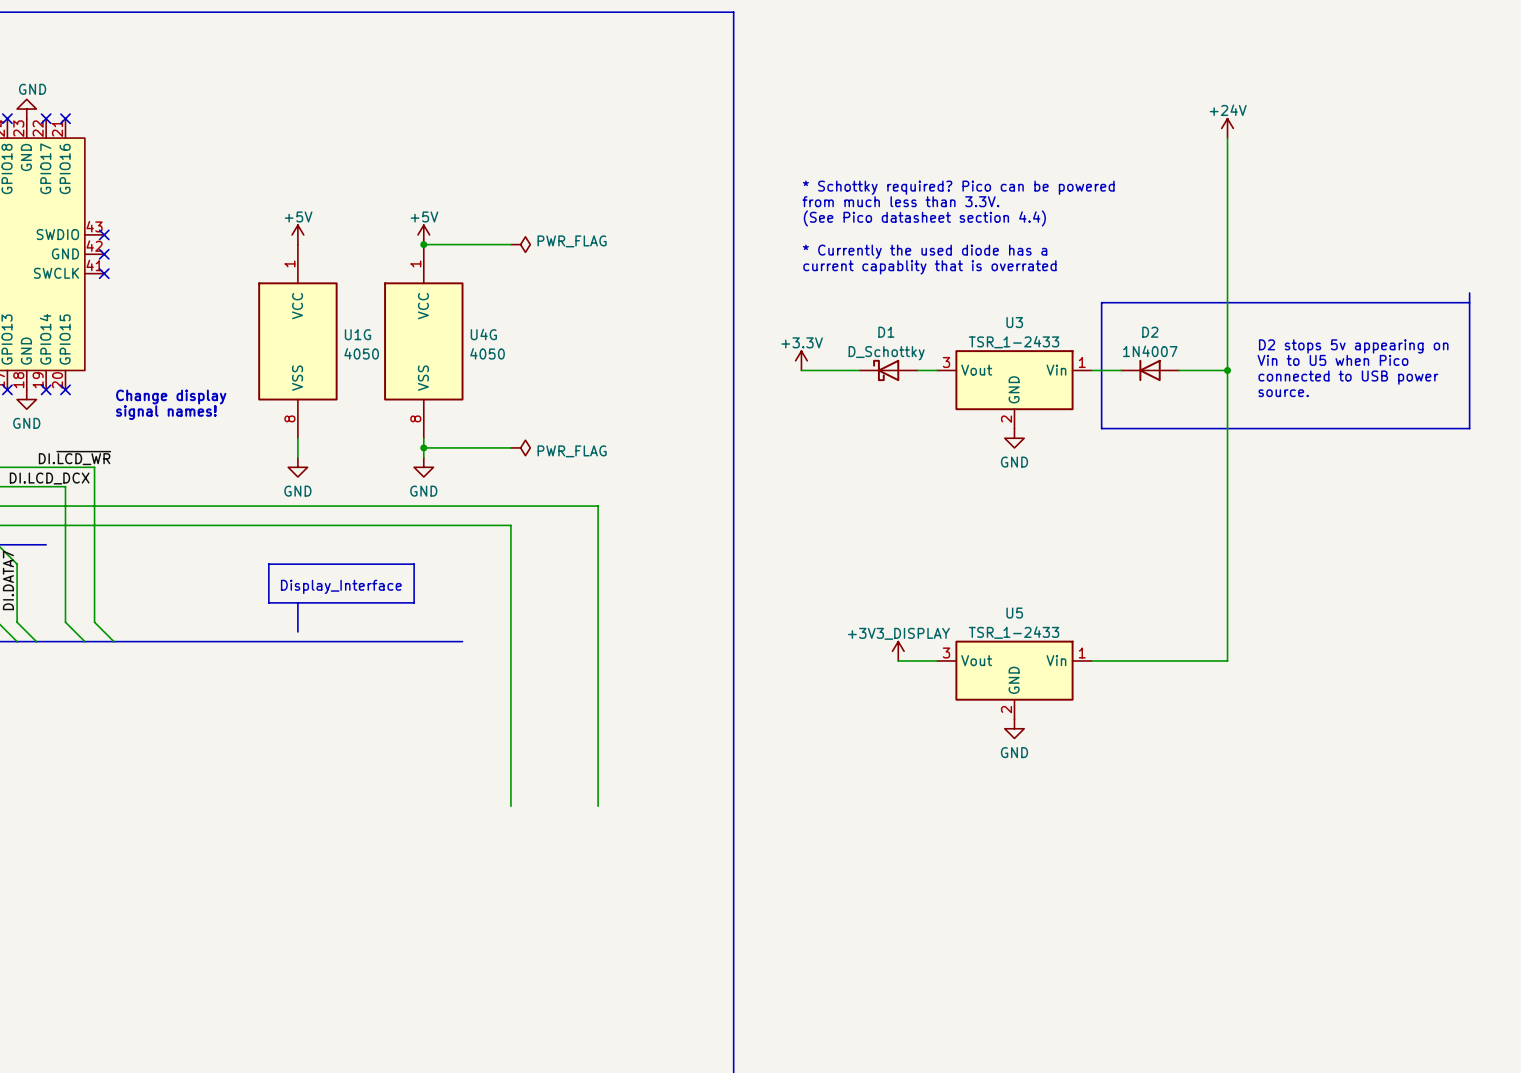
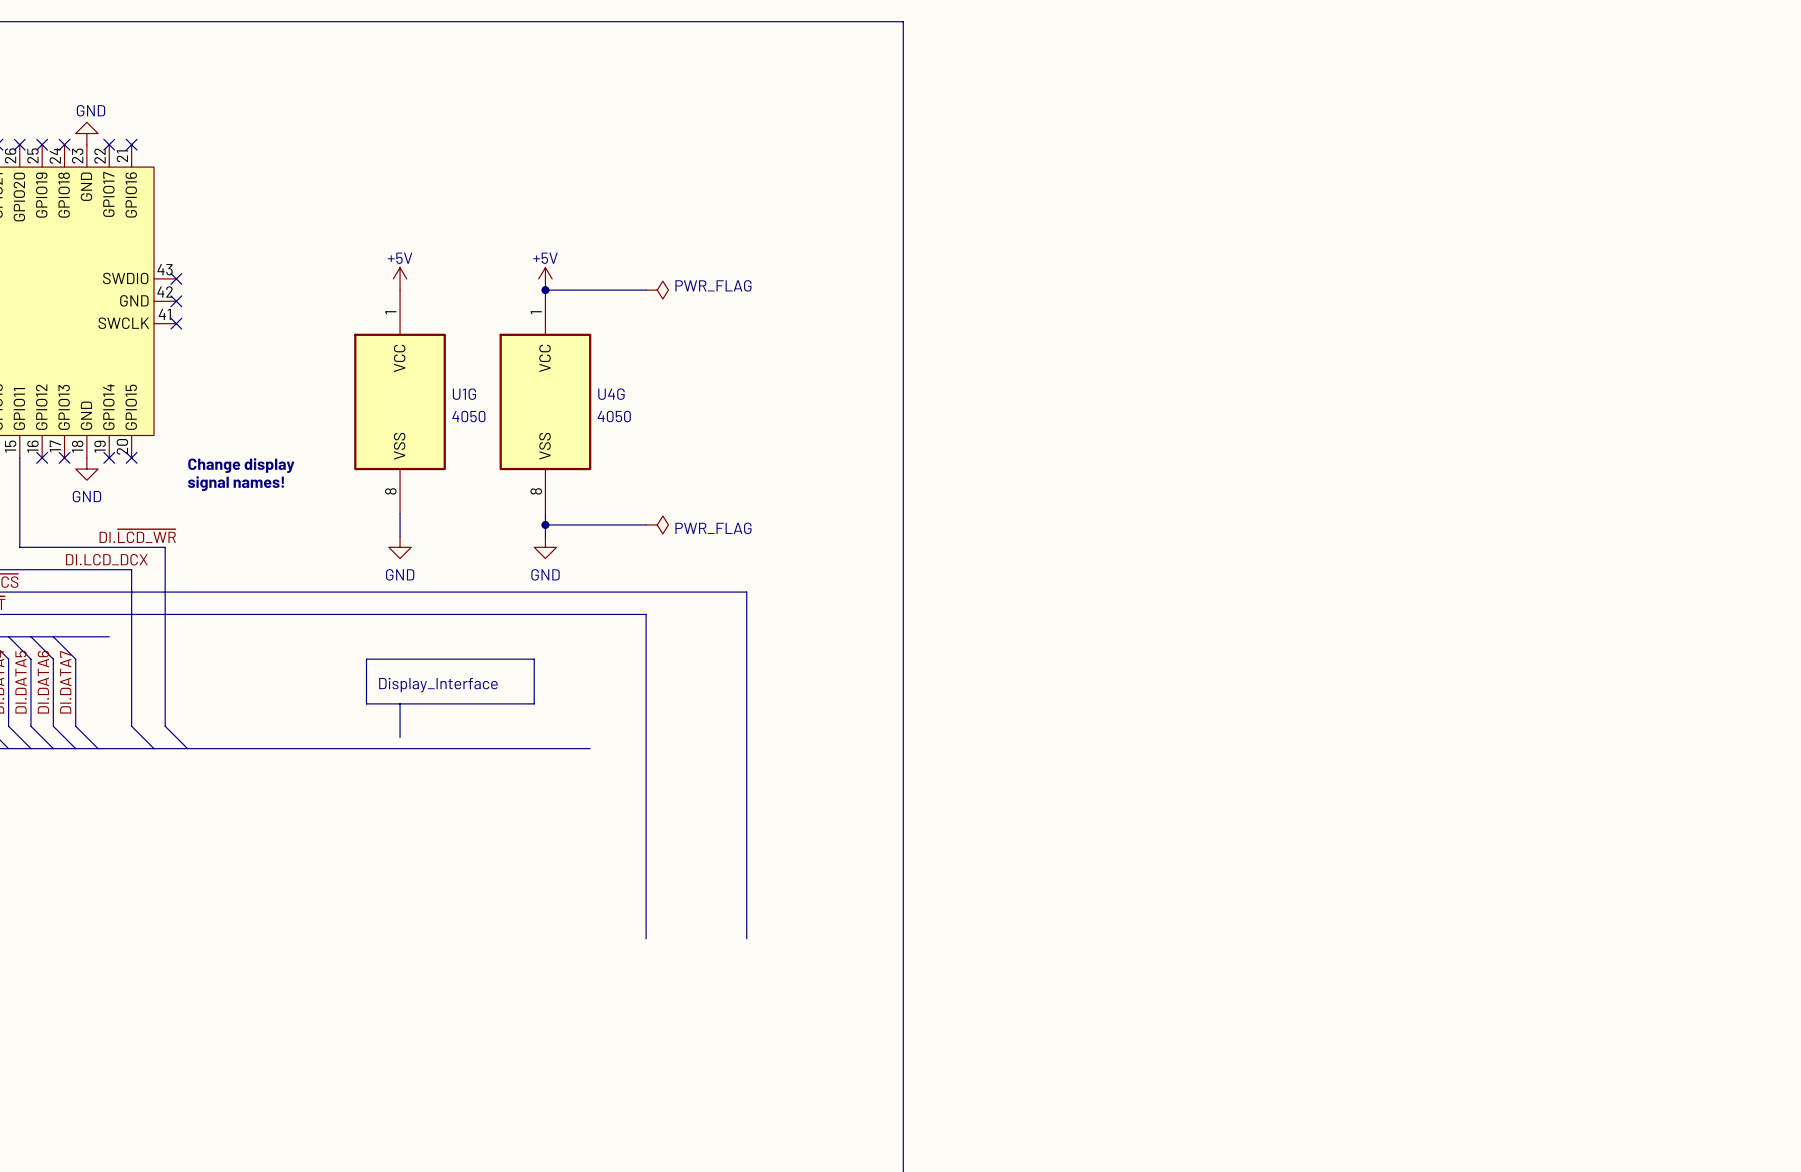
power symbol: +24V (1227, 128) -> none
wire: (1227, 138) (1227, 660) (1091, 660) -> none
text: * Schottky required? Pico can be powered (958, 187) -> none
text: from much less than 3.3V. (900, 201) -> none
text: (See Pico datasheet section 4.4) (924, 218) -> none
text: * Currently the used diode has a (925, 251) -> none
text: current capablity that is overrated (929, 267) -> none
line: (1469, 293) (1469, 428) (1101, 428) (1101, 302) (1469, 302) -> none
text: D2 stops 5v appearing on (1353, 346) -> none
power symbol: +3.3V (801, 360) -> none
text: Vin to U5 when Pico (1332, 360) -> none
wire: (801, 370) (859, 370) -> none
D1: D_Schottky (888, 370) -> none
wire: (917, 370) (937, 370) -> none
wire: (1091, 370) (1121, 370) -> none
D2: 1N4007 (1150, 370) -> none
wire: (1179, 370) (1227, 370) -> none
junction: (1227, 370) -> none
text: connected to USB power (1348, 377) -> none
U3: TSR_1-2433 (1014, 389) -> none
text: source. (1283, 393) -> none
power symbol: GND (1014, 438) -> none
power symbol: +3V3_DISPLAY (898, 651) -> none
wire: (898, 660) (937, 660) -> none
U5: TSR_1-2433 (1014, 679) -> none
power symbol: GND (1014, 728) -> none

